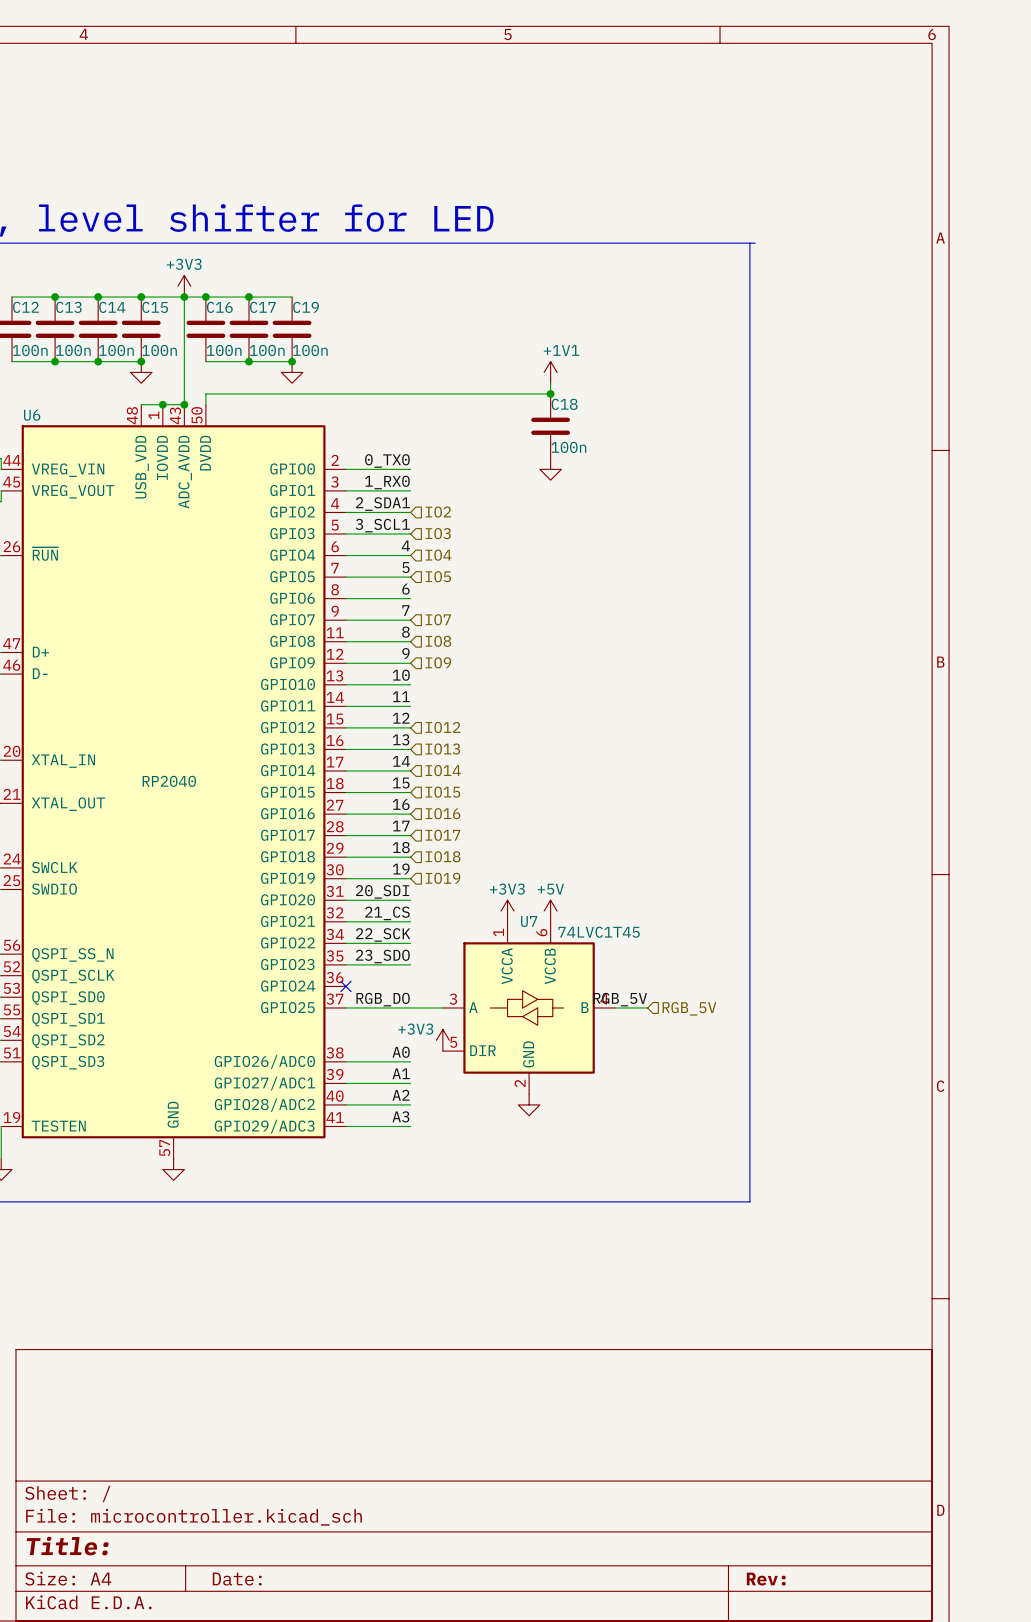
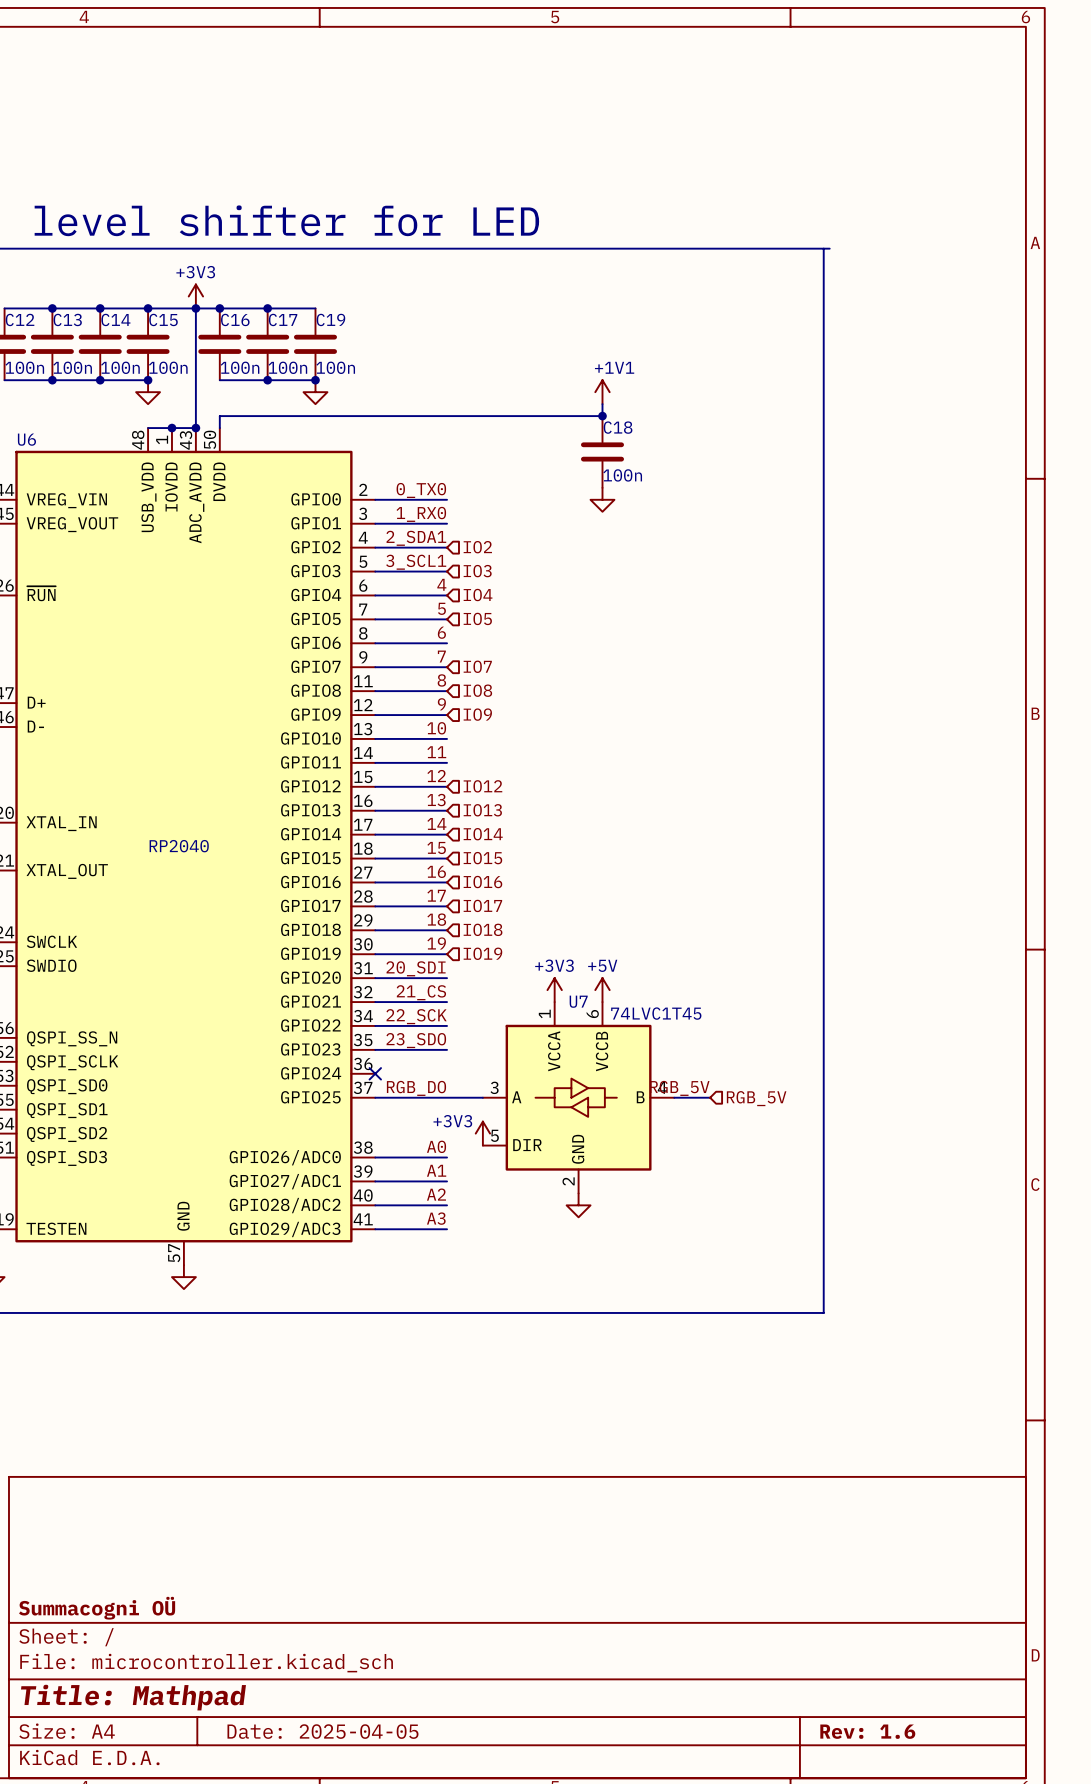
title block: none -> Summacogni OÜ (97, 1608)
title block: Title: (67, 1546) -> Title: Mathpad (133, 1697)
title block: Date: (237, 1579) -> Date: 2025-04-05 (322, 1731)
title block: Rev: (766, 1579) -> Rev: 1.6 (867, 1731)

